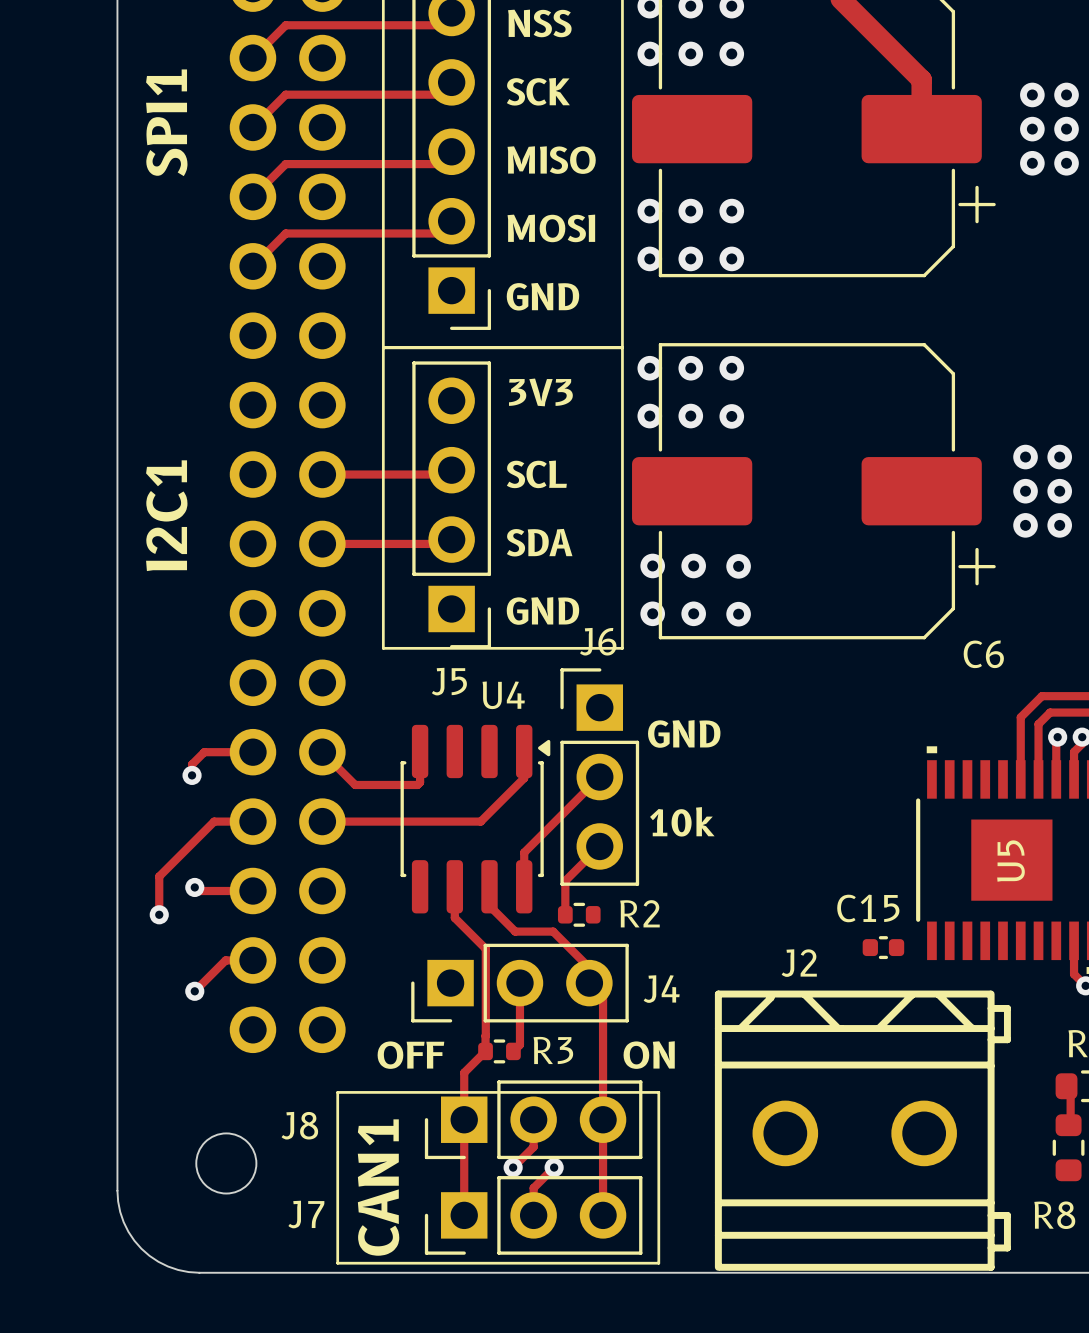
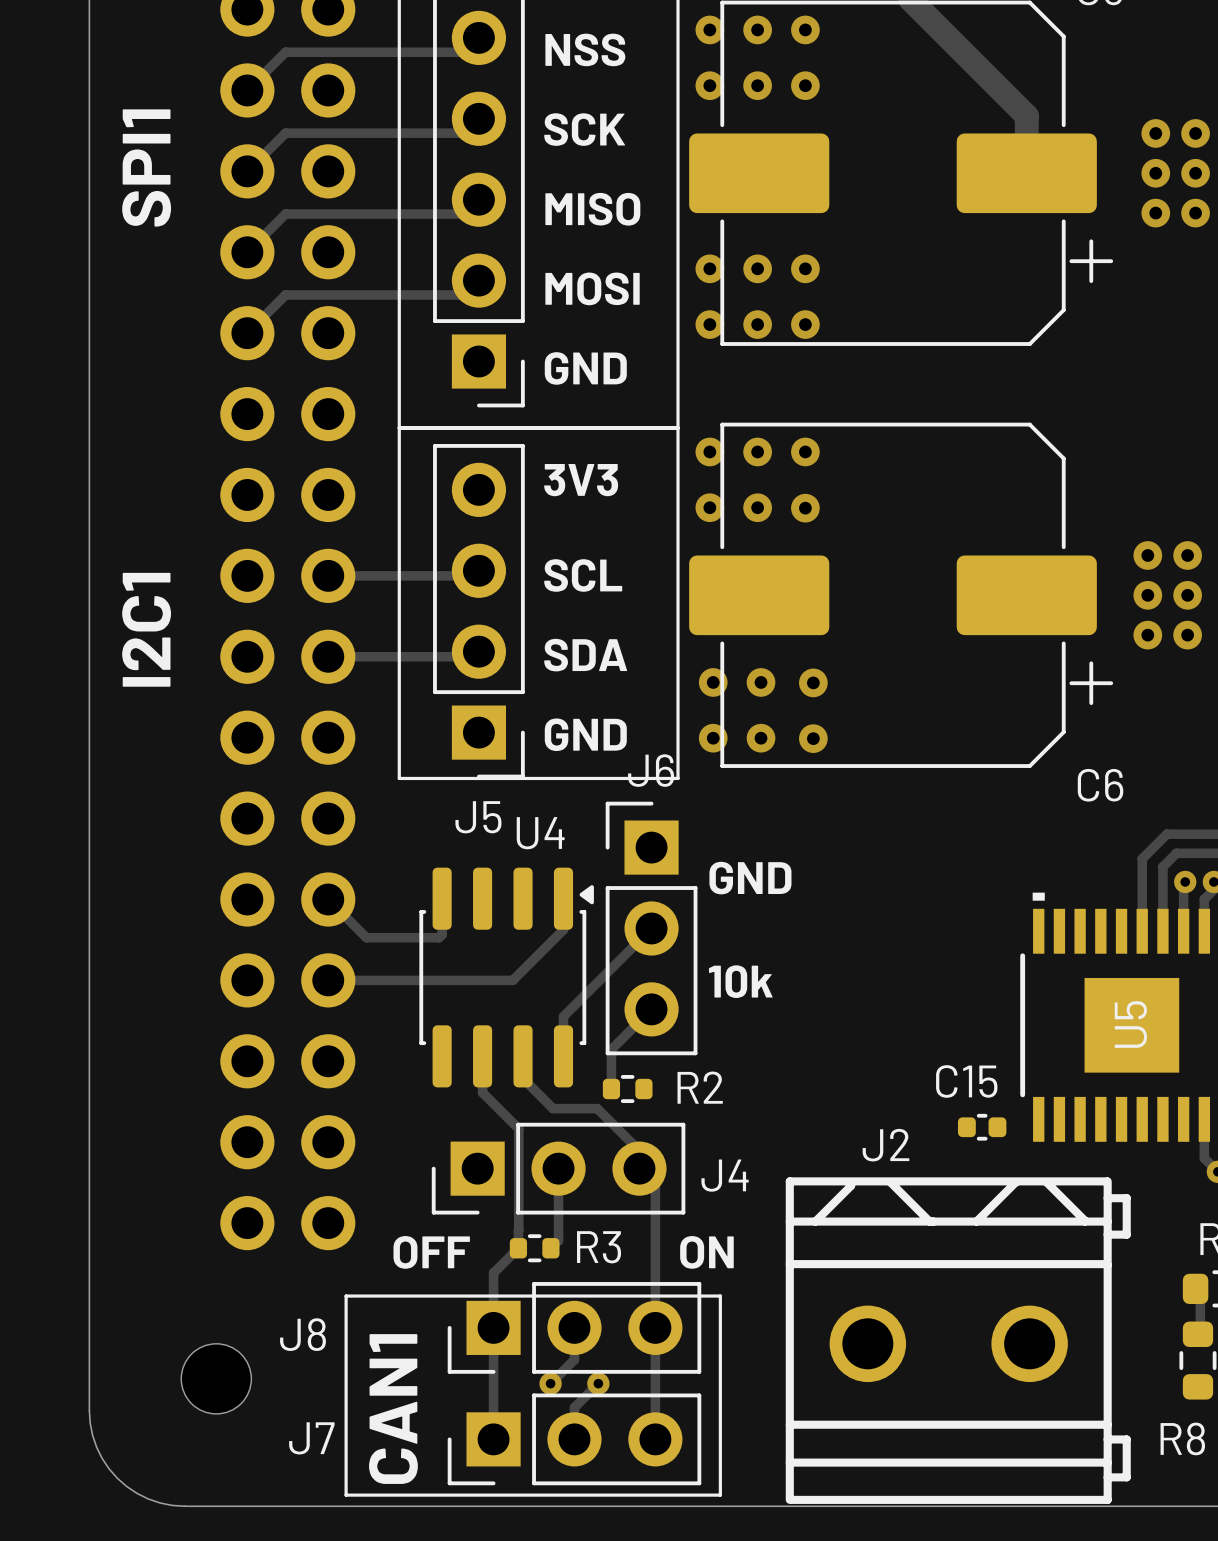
track: (252, 752) (204, 752) (192, 764) (192, 775) -> none
via: (192, 775) -> none
track: (252, 821) (214, 821) (159, 876) (159, 914) -> none
track: (194, 887) (198, 891) (252, 891) -> none
via: (194, 887) -> none
via: (159, 914) -> none
track: (252, 960) (225, 960) (194, 991) -> none
via: (194, 991) -> none

